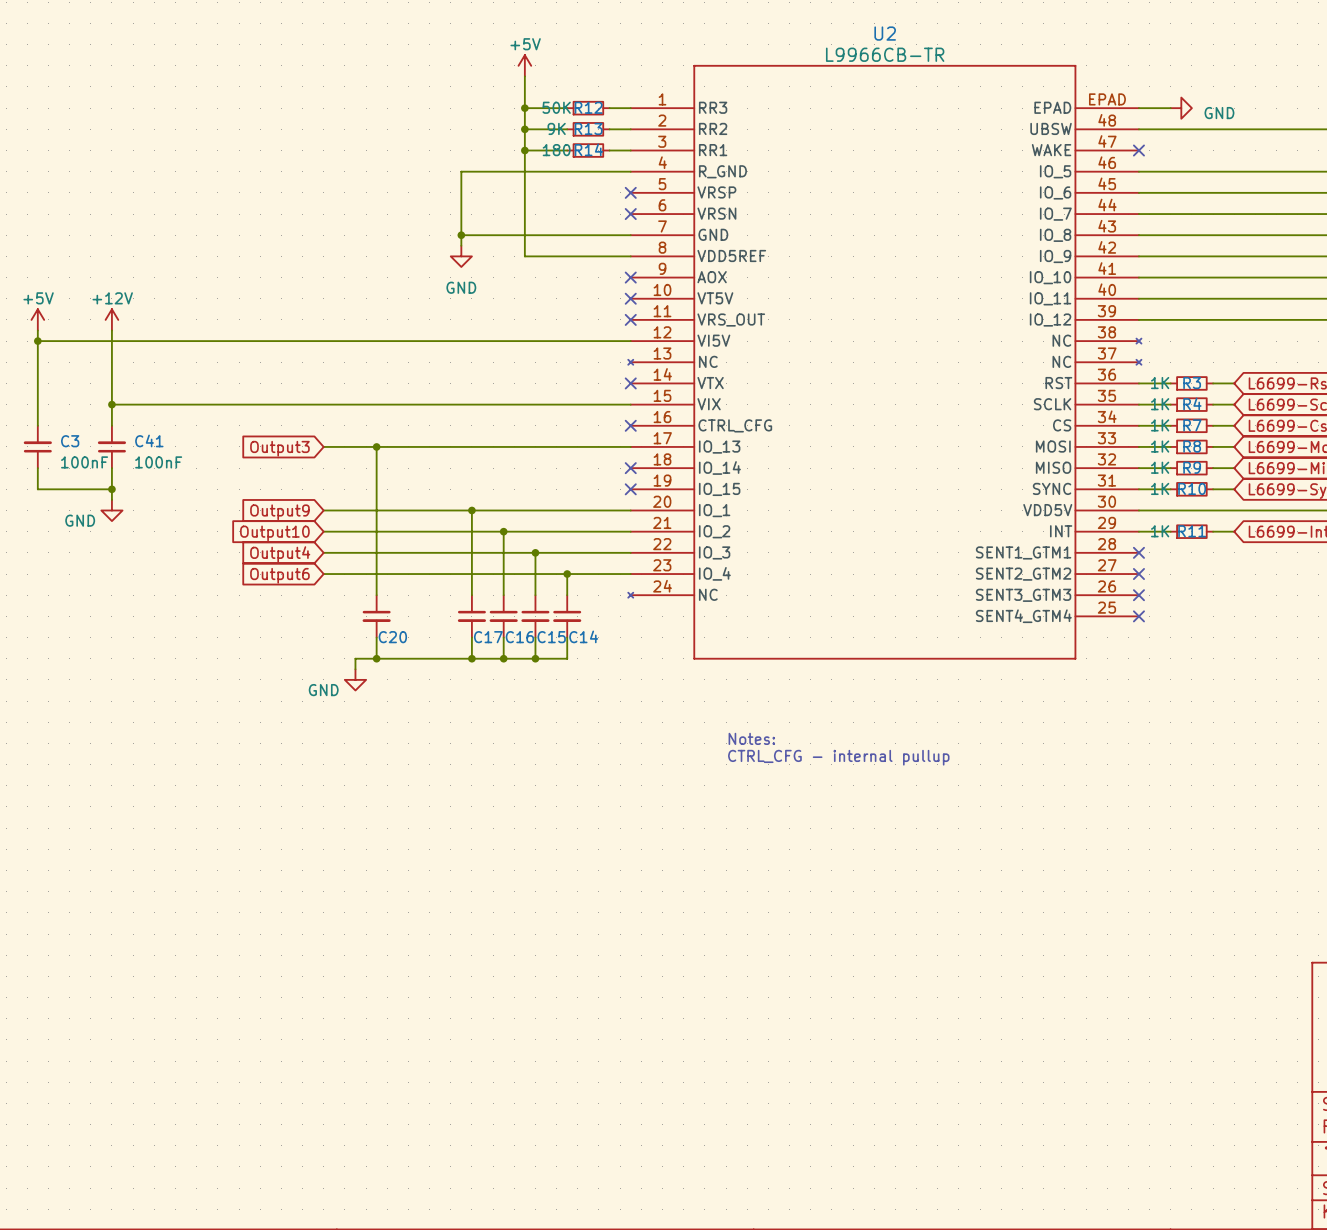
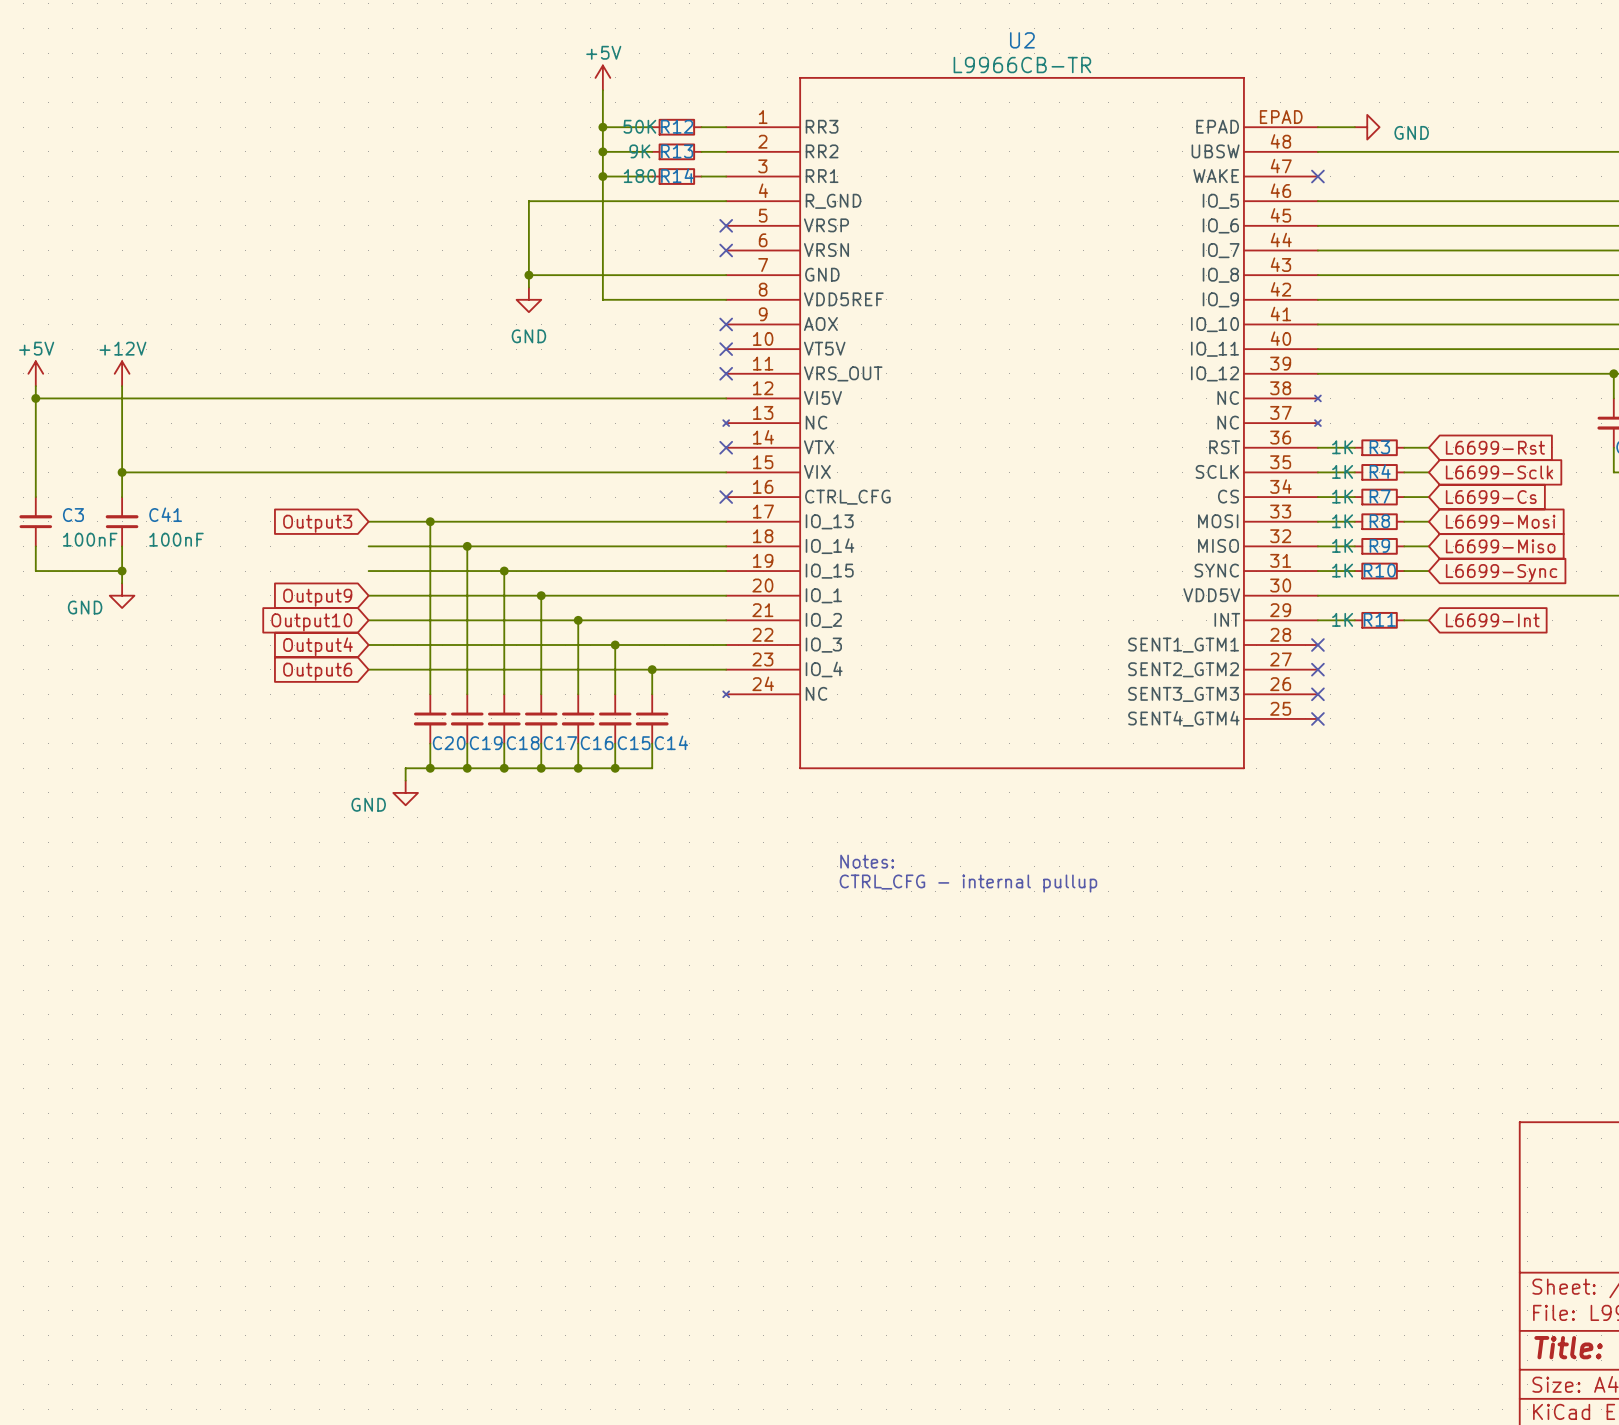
wire: none -> (368, 546) (726, 546)
wire: none -> (467, 546) (467, 694)
junction: none -> (467, 546)
no-connect mark: (630, 468) -> none
wire: none -> (368, 571) (726, 571)
wire: none -> (504, 571) (504, 694)
junction: none -> (504, 571)
no-connect mark: (630, 489) -> none
C19: none -> (467, 718)
C18: none -> (504, 718)
wire: none -> (467, 743) (467, 768)
wire: none -> (504, 743) (504, 768)
junction: none -> (467, 768)
junction: none -> (504, 768)

